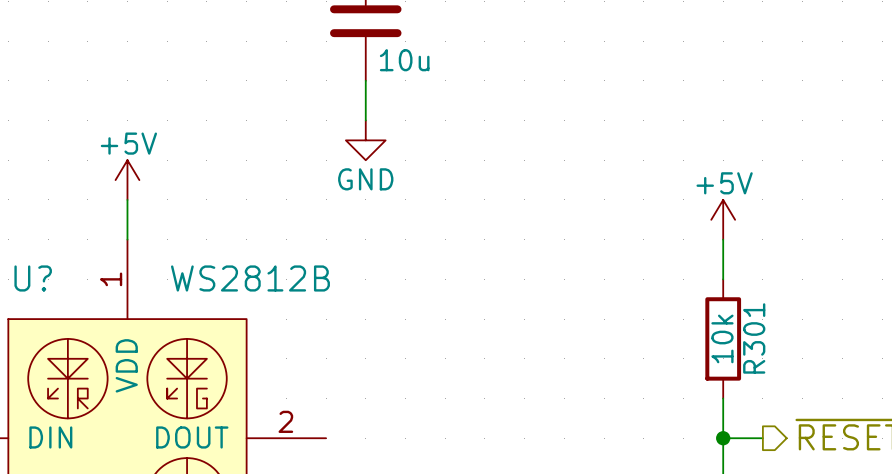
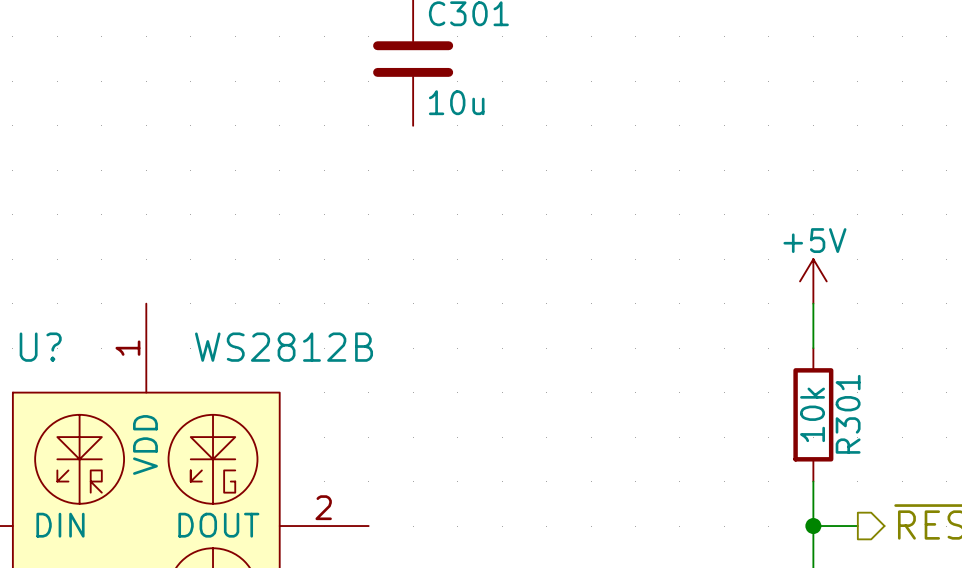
wire: (365, 80) (365, 120) -> none
power symbol: GND (365, 140) -> none
power symbol: +5V (127, 180) -> none
wire: (127, 199) (127, 239) -> none

